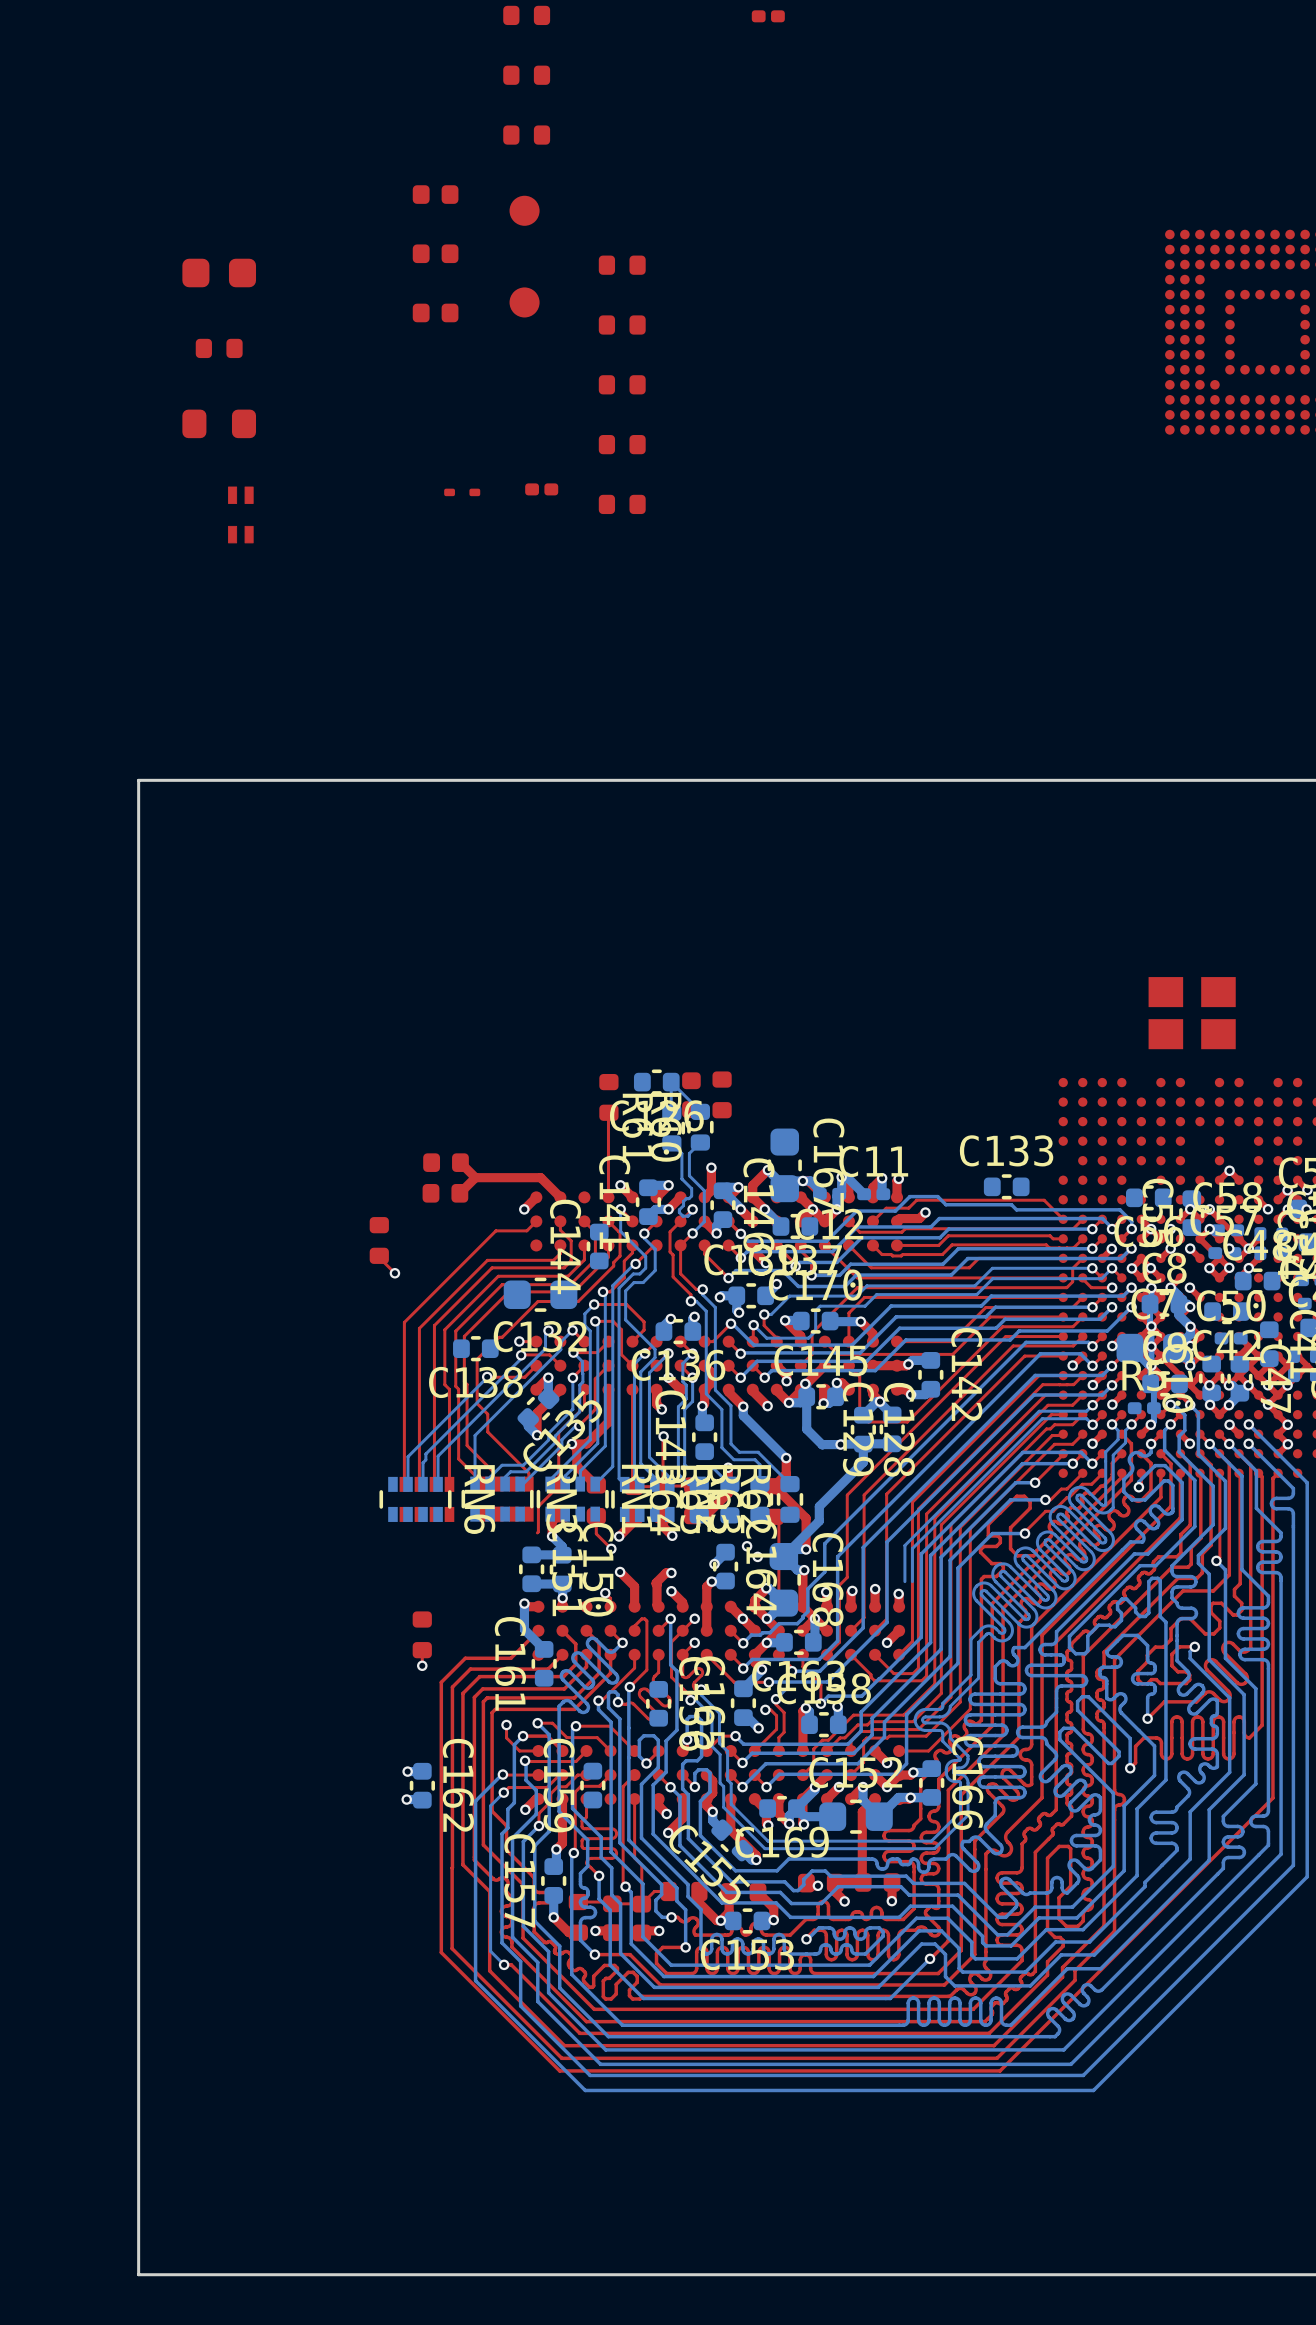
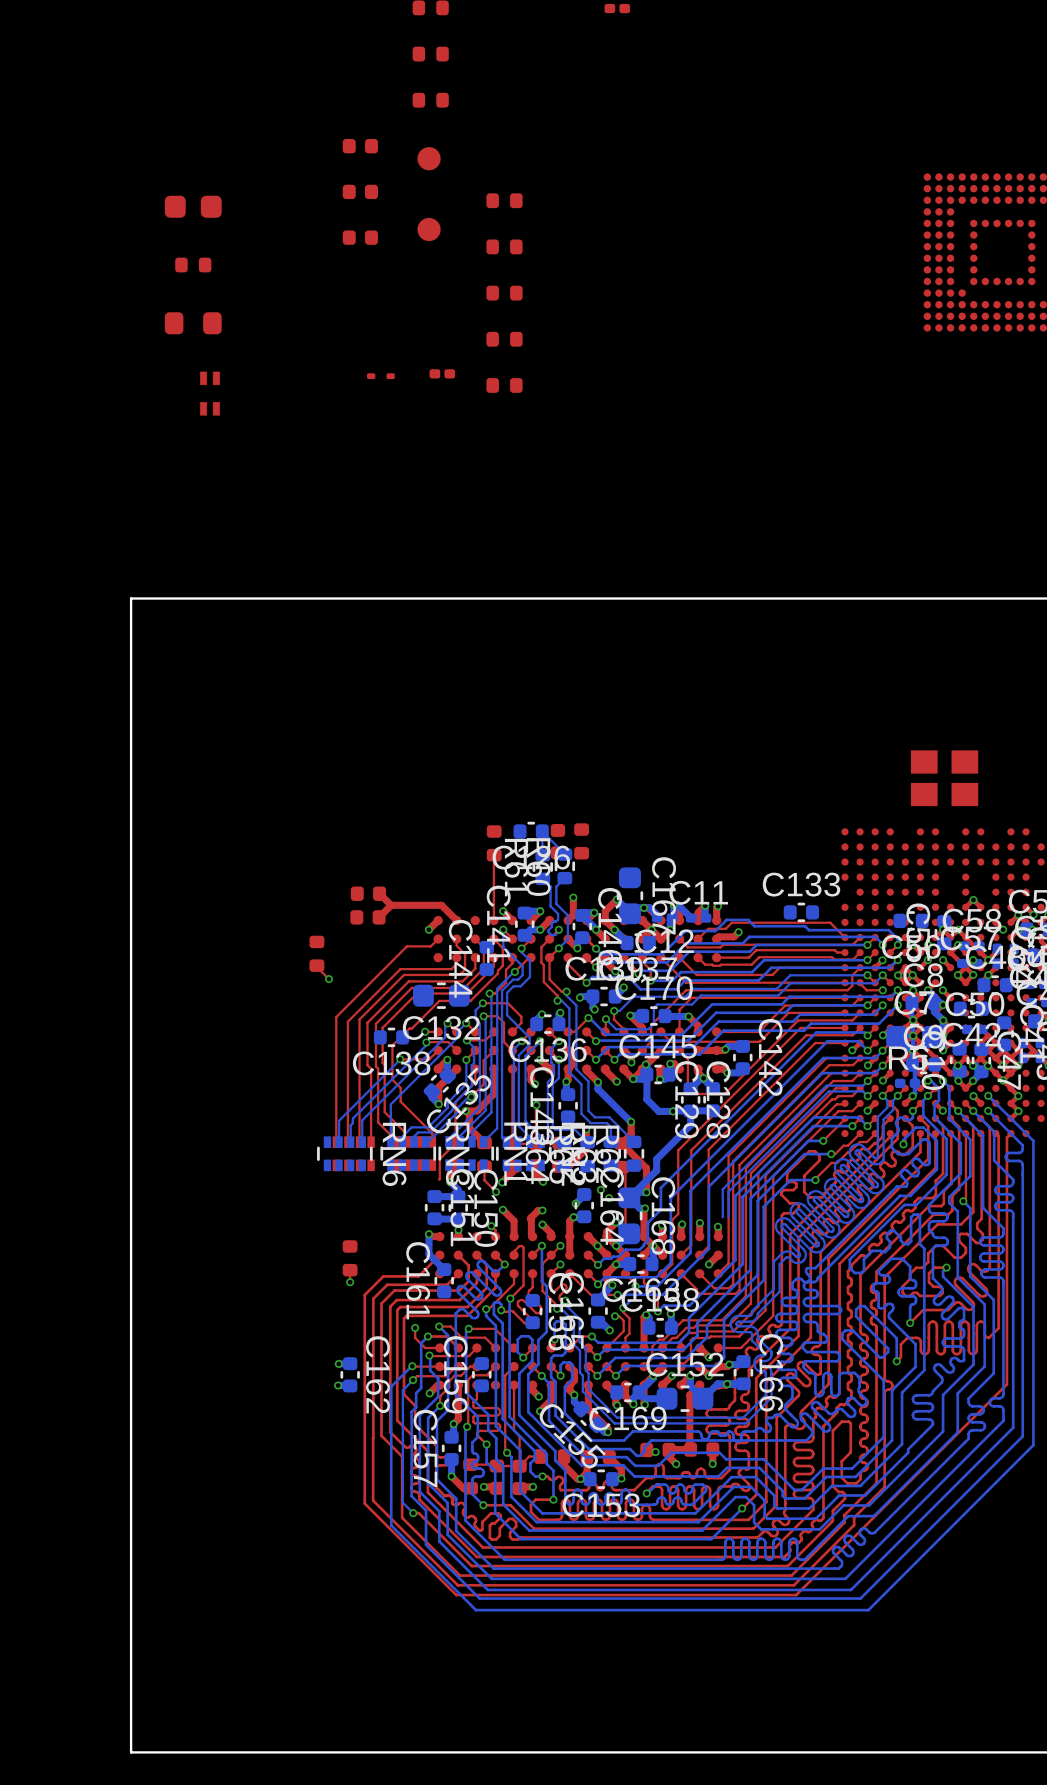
bottom track: (1056, 1631) (1055, 1642) (1042, 1645) (1040, 1651) (1044, 1654) (1062, 1655) (1063, 1663) (1030, 1665) (1026, 1668) (1027, 1673) (1031, 1675) (1082, 1675) (1085, 1678) (1086, 1682) (1082, 1685) (1058, 1687) (1056, 1690) (1056, 1712) (1045, 1725) (1021, 1727) (1017, 1732) (1021, 1737) (1044, 1738) (1055, 1753) (1055, 1759) (1040, 1774) (1042, 1780) (1048, 1780) (1063, 1765) (1070, 1768) (1070, 1773) (1055, 1788) (1057, 1795) (1063, 1795) (1078, 1780) (1084, 1782) (1084, 1788) (1070, 1803) (1071, 1809) (1077, 1809) (1093, 1795) (1100, 1797) (1099, 1812) (1091, 1815) (1089, 1819) (1091, 1824) (1099, 1827) (1099, 1833) (1095, 1835) (1075, 1835) (1071, 1840) (1075, 1845) (1097, 1846) (1100, 1850) (1100, 1859) (1088, 1869) (1076, 1860) (1070, 1861) (1069, 1867) (1078, 1879) (1067, 1893) (1062, 1890) (1061, 1880) (1058, 1877) (1052, 1880) (1051, 1889) (1049, 1892) (1026, 1894) (1009, 1879) (1004, 1878) (1001, 1881) (1001, 1885) (1015, 1900) (1016, 1904) (1005, 1917) (998, 1917) (964, 1883) (913, 1883) (906, 1876) (830, 1876) (825, 1871) (812, 1871) -> (839, 1255) (816, 1281) (804, 1283) (805, 1289) (815, 1290) (817, 1294) (815, 1297) (805, 1298) (803, 1302) (807, 1306) (838, 1306) (840, 1311) (837, 1314) (805, 1315) (804, 1320) (816, 1323) (817, 1331) (827, 1337) (827, 1340) (825, 1342) (805, 1342) (802, 1344) (802, 1348) (806, 1352) (836, 1352) (839, 1358) (837, 1361) (805, 1361) (803, 1367) (808, 1372) (814, 1374) (815, 1392) (818, 1396) (823, 1393) (823, 1376) (825, 1373) (831, 1375) (831, 1393) (835, 1396) (839, 1393) (840, 1374) (854, 1372) (859, 1377) (858, 1391) (866, 1401) (862, 1405) (852, 1397) (847, 1398) (847, 1403) (855, 1411) (854, 1415) (849, 1416) (840, 1408) (829, 1413) (818, 1403) (814, 1402) (812, 1408) (829, 1425) (830, 1428) (827, 1431) (824, 1431) (807, 1414) (802, 1413) (801, 1419) (812, 1432) (806, 1440) (651, 1440)
bottom track: (995, 1672) (995, 1679) (997, 1683) (1021, 1683) (1025, 1688) (1020, 1694) (974, 1694) (970, 1697) (970, 1701) (974, 1704) (1020, 1704) (1024, 1708) (1024, 1712) (1020, 1714) (969, 1714) (965, 1718) (966, 1722) (969, 1724) (1002, 1725) (1006, 1729) (1005, 1733) (1002, 1735) (968, 1735) (965, 1740) (968, 1745) (1013, 1745) (1017, 1749) (1016, 1753) (1013, 1756) (982, 1756) (979, 1760) (981, 1765) (1020, 1766) (1024, 1769) (1024, 1773) (1021, 1776) (984, 1776) (980, 1778) (979, 1783) (982, 1787) (1020, 1787) (1024, 1789) (1024, 1793) (1022, 1796) (999, 1797) (995, 1800) (995, 1805) -> (792, 1287) (796, 1291) (796, 1296) (784, 1298) (782, 1302) (785, 1305) (796, 1306) (796, 1312) (779, 1314) (776, 1317) (779, 1321) (795, 1321) (797, 1323) (795, 1329) (779, 1329) (776, 1333) (778, 1337) (789, 1338) (792, 1340) (790, 1345) (782, 1346) (779, 1349) (782, 1353) (790, 1354) (791, 1359) (779, 1362) (777, 1365) (780, 1369) (795, 1370) (795, 1377) (782, 1378) (779, 1381) (781, 1385) (790, 1386) (792, 1389)
bottom track: (965, 1851) (977, 1863) (977, 1869) (970, 1870) (958, 1858) -> (769, 1425) (769, 1430) (764, 1430)

